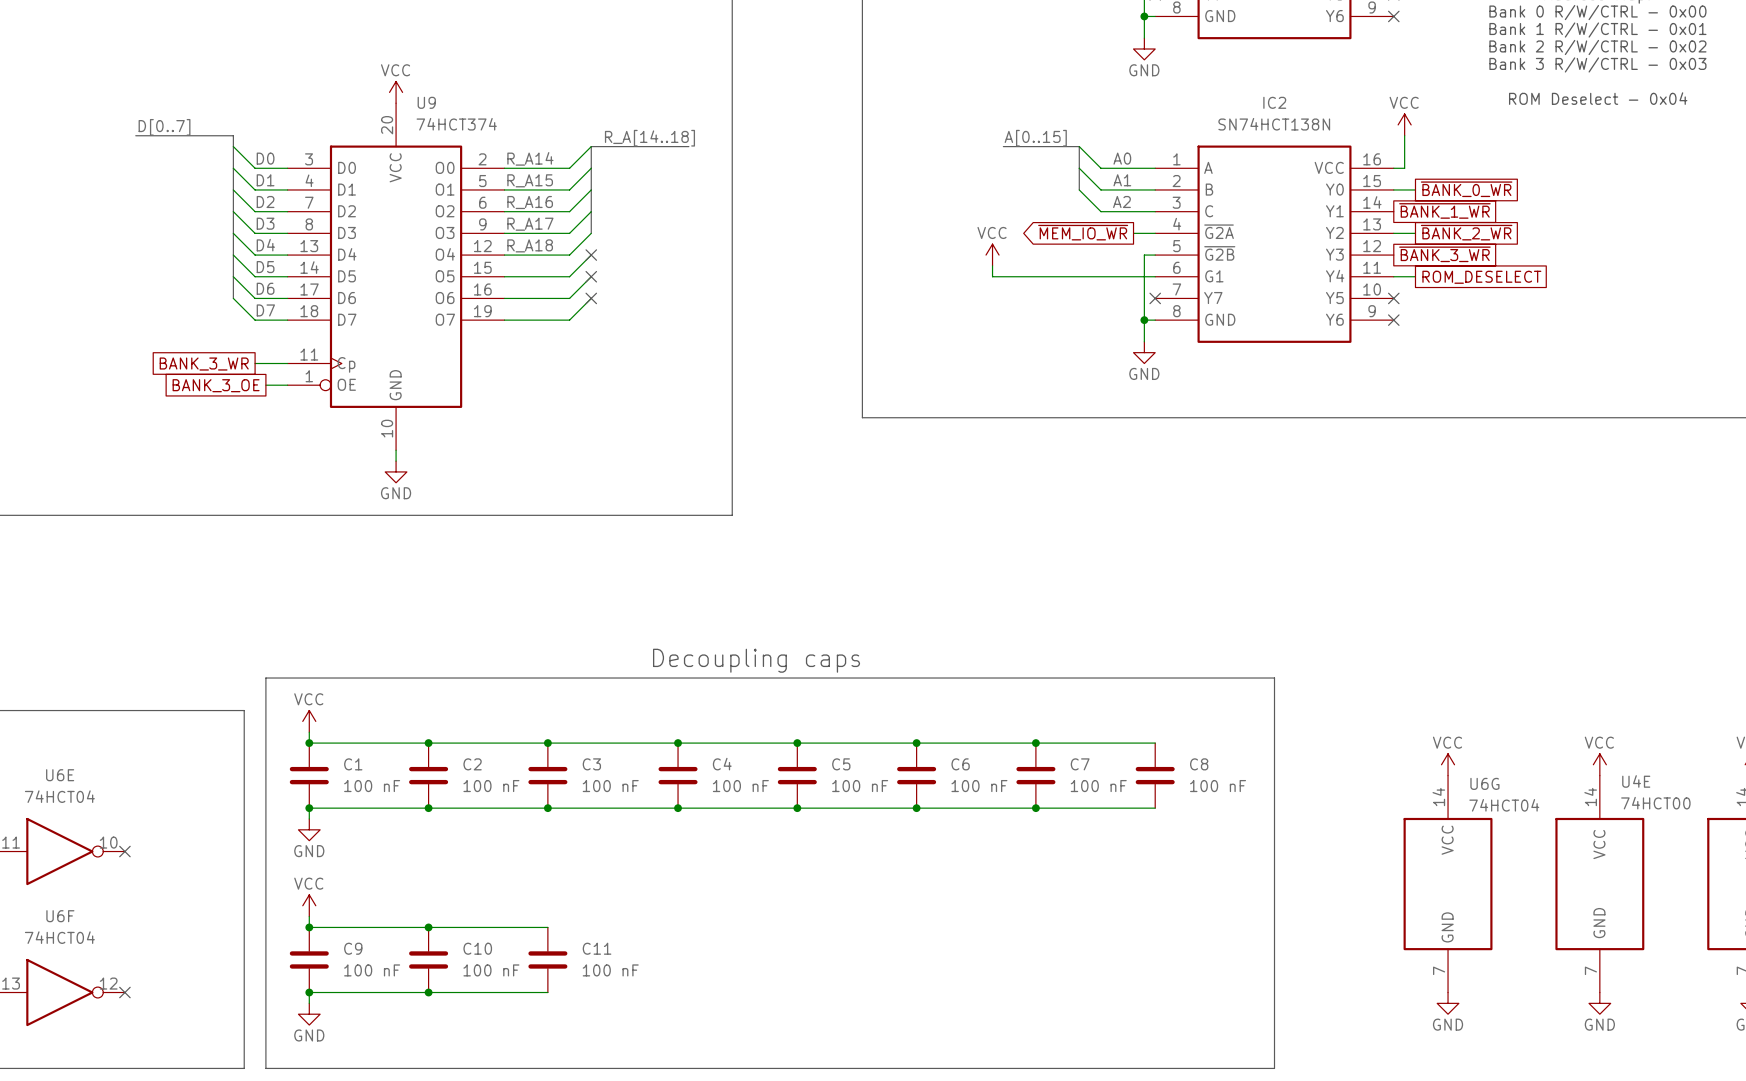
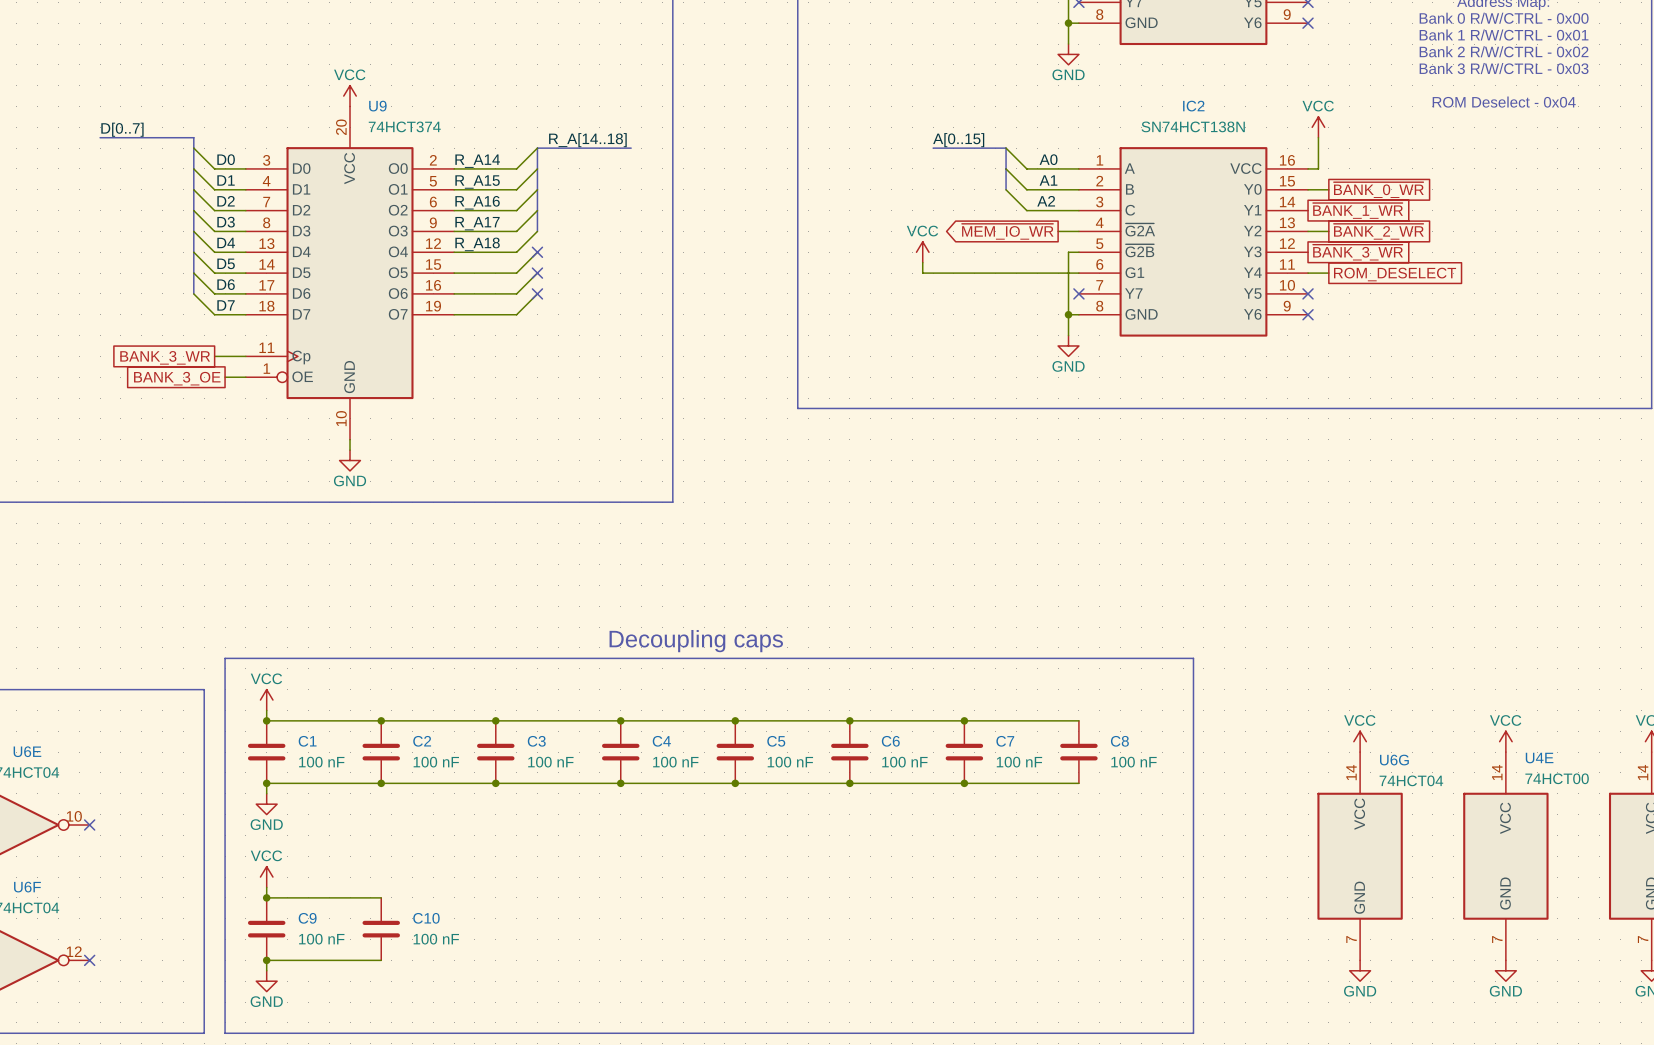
wire: (428, 927) (547, 927) -> none
junction: (428, 927) -> none
C11: 100 nF (547, 959) -> none
wire: (428, 992) (547, 992) -> none
junction: (428, 992) -> none

